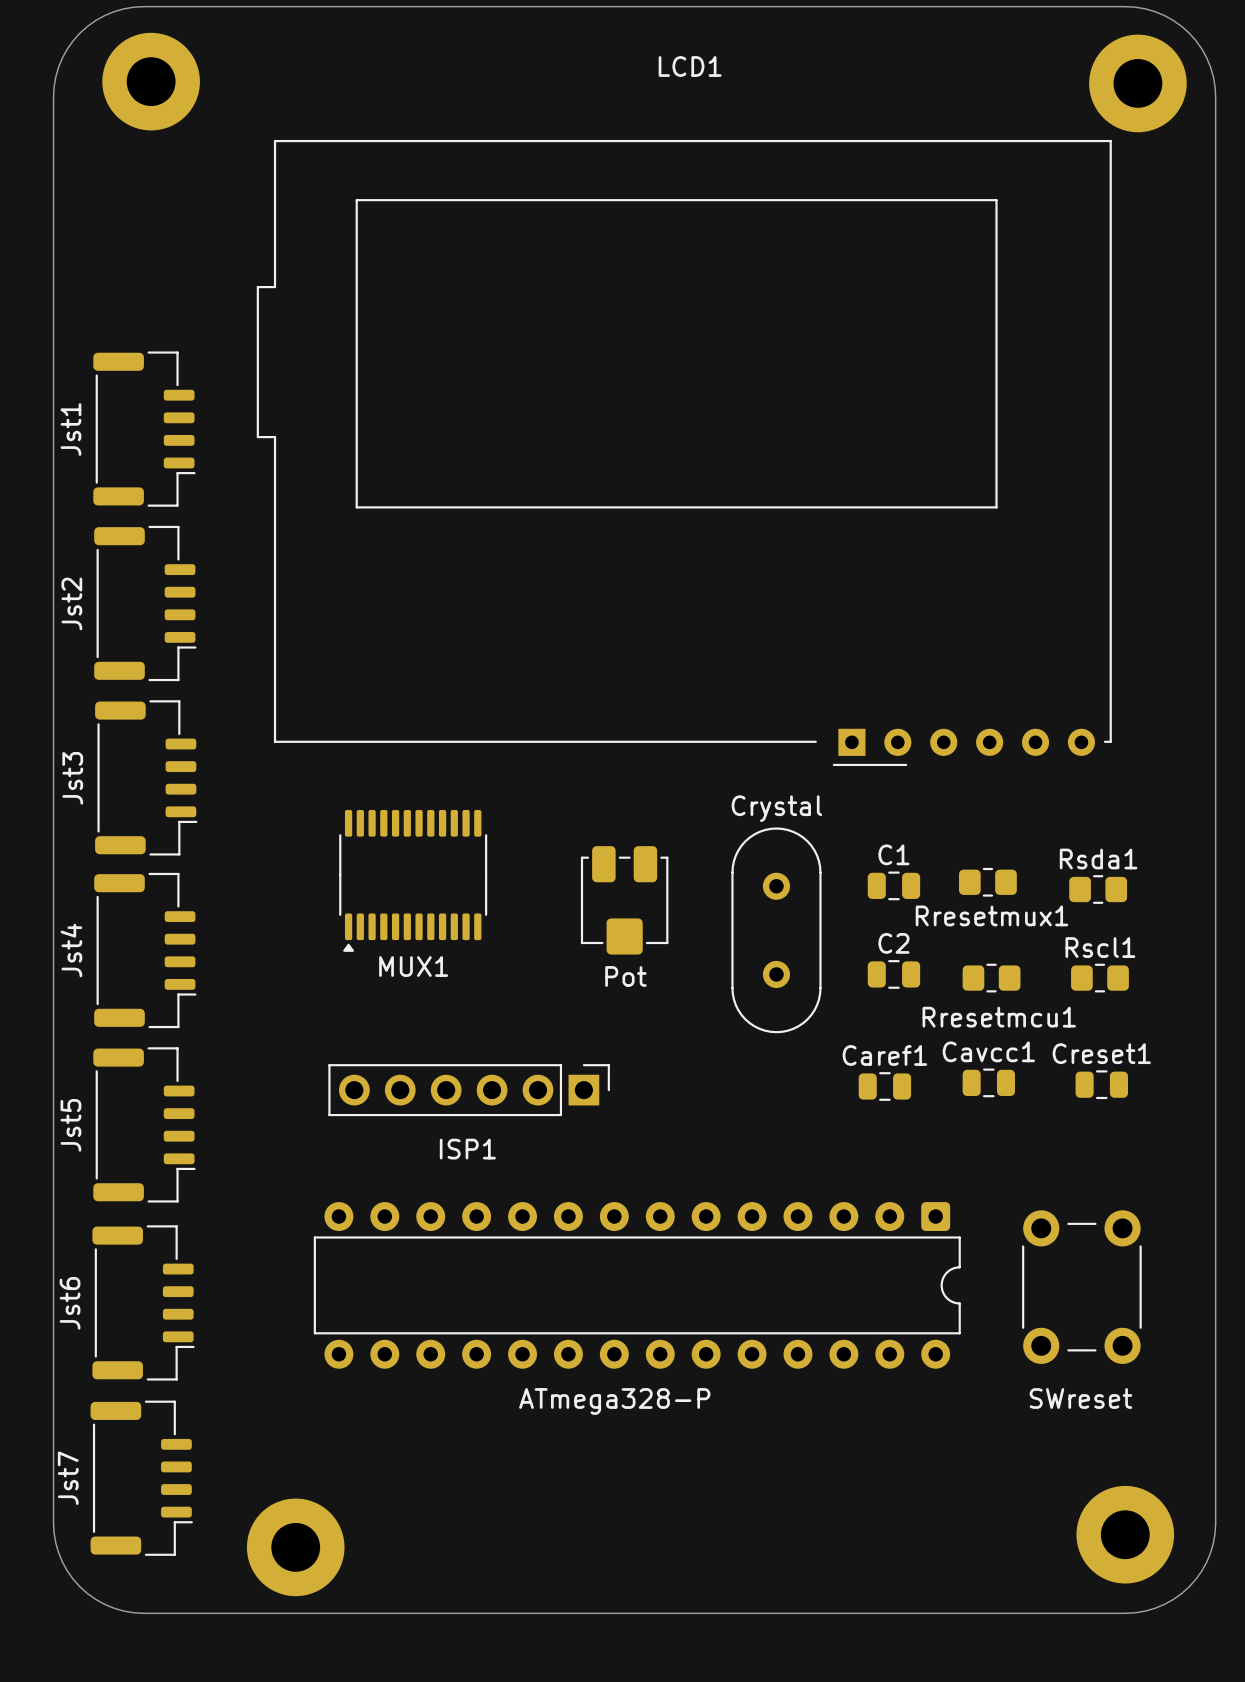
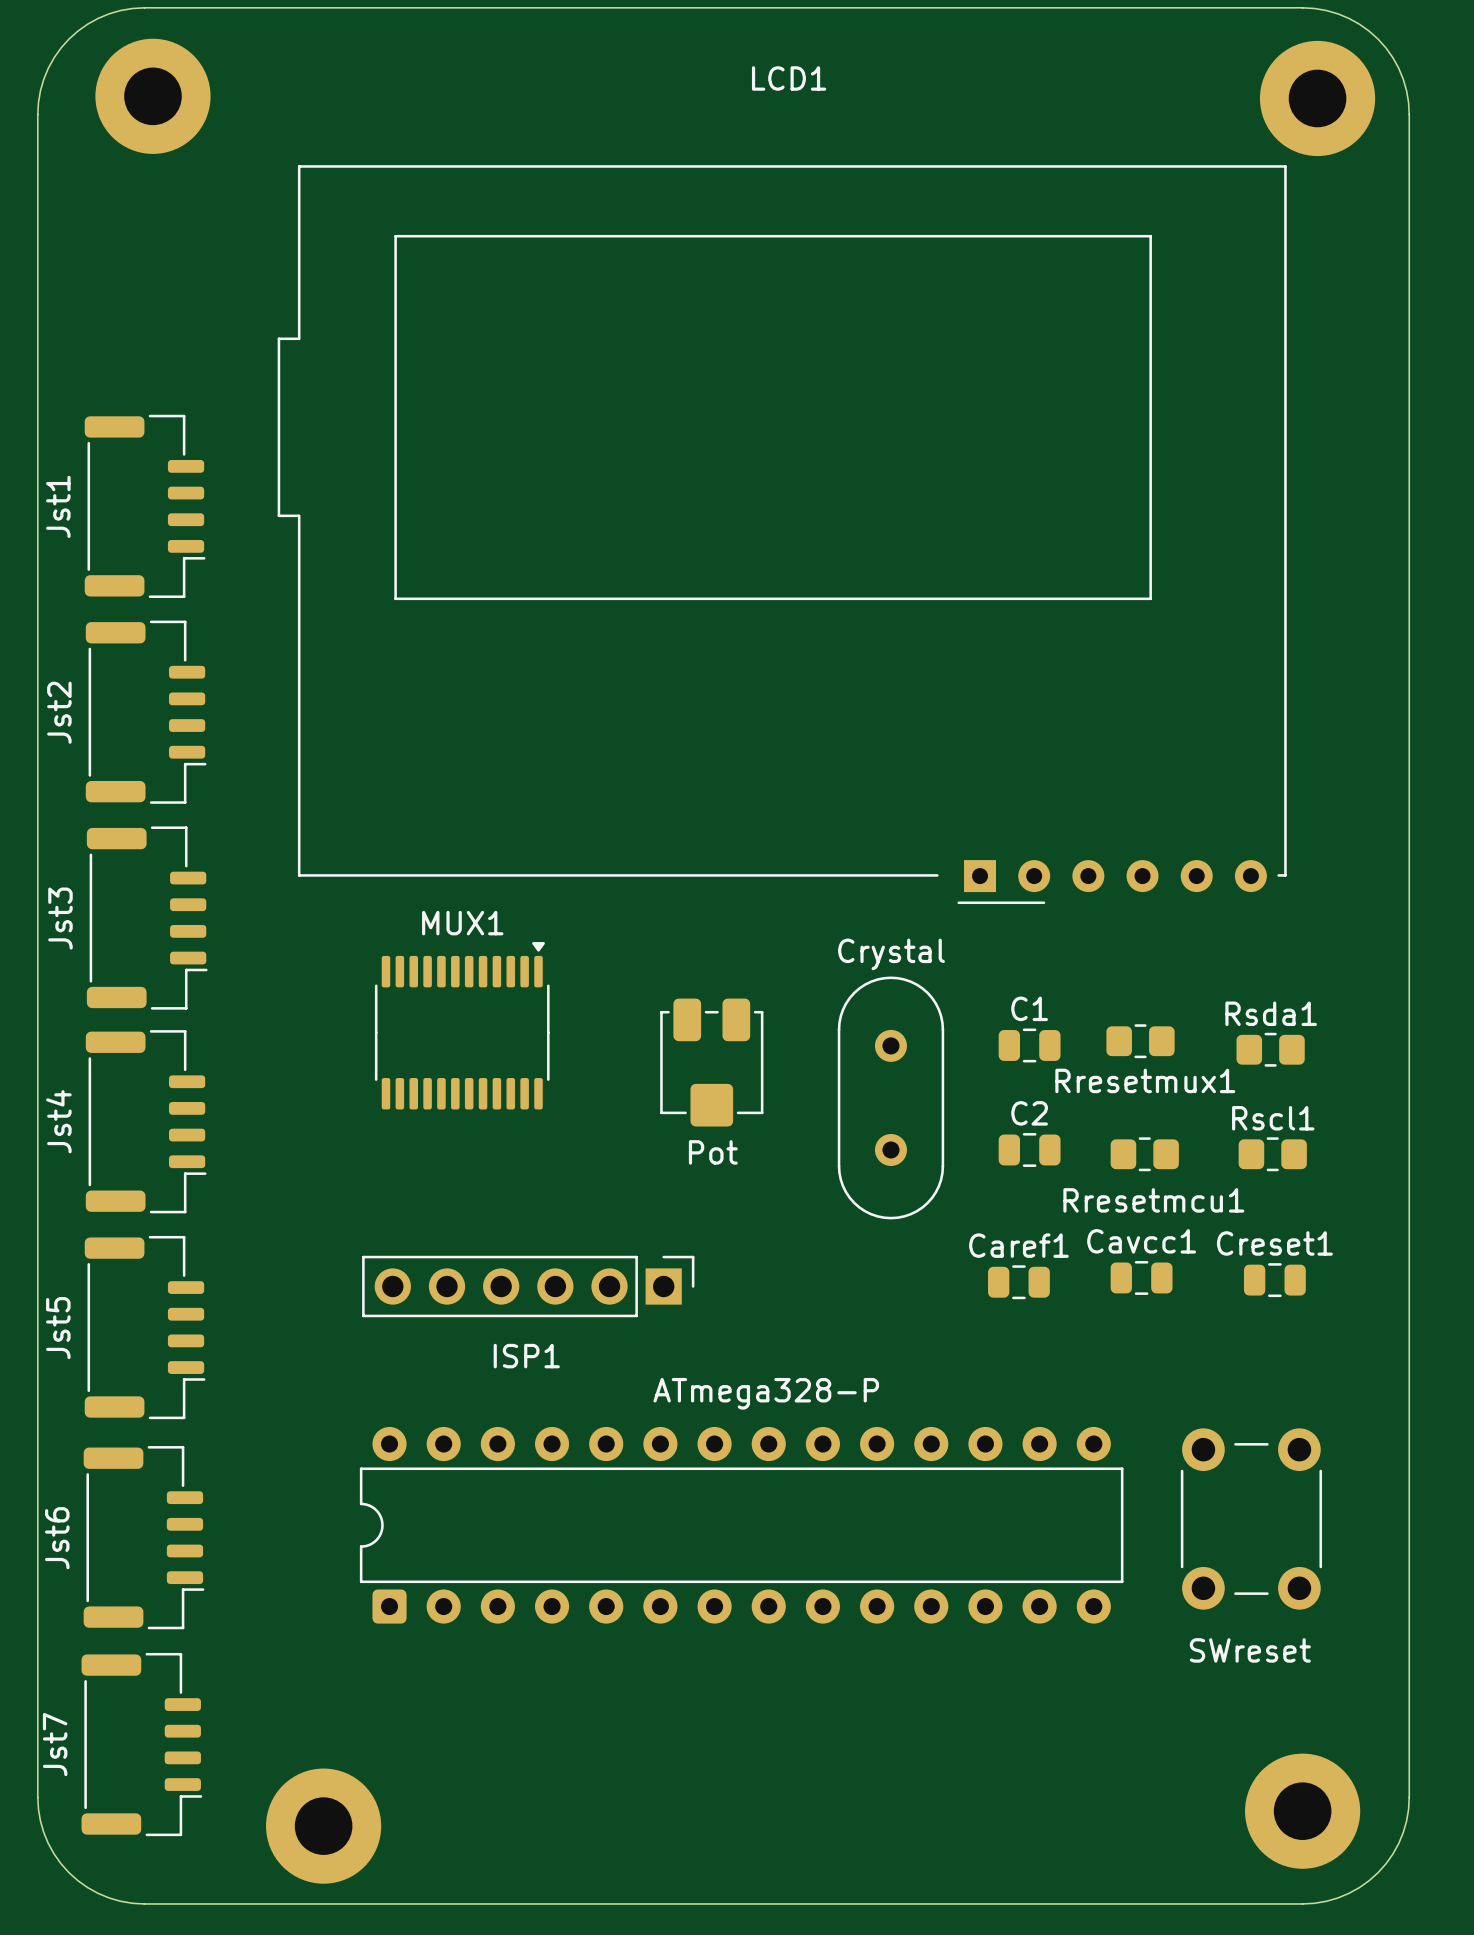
MUX1 rotation: 0° (413, 880) -> 180° (462, 1025)
part rotation: 0° (637, 1285) -> 180° (741, 1525)

